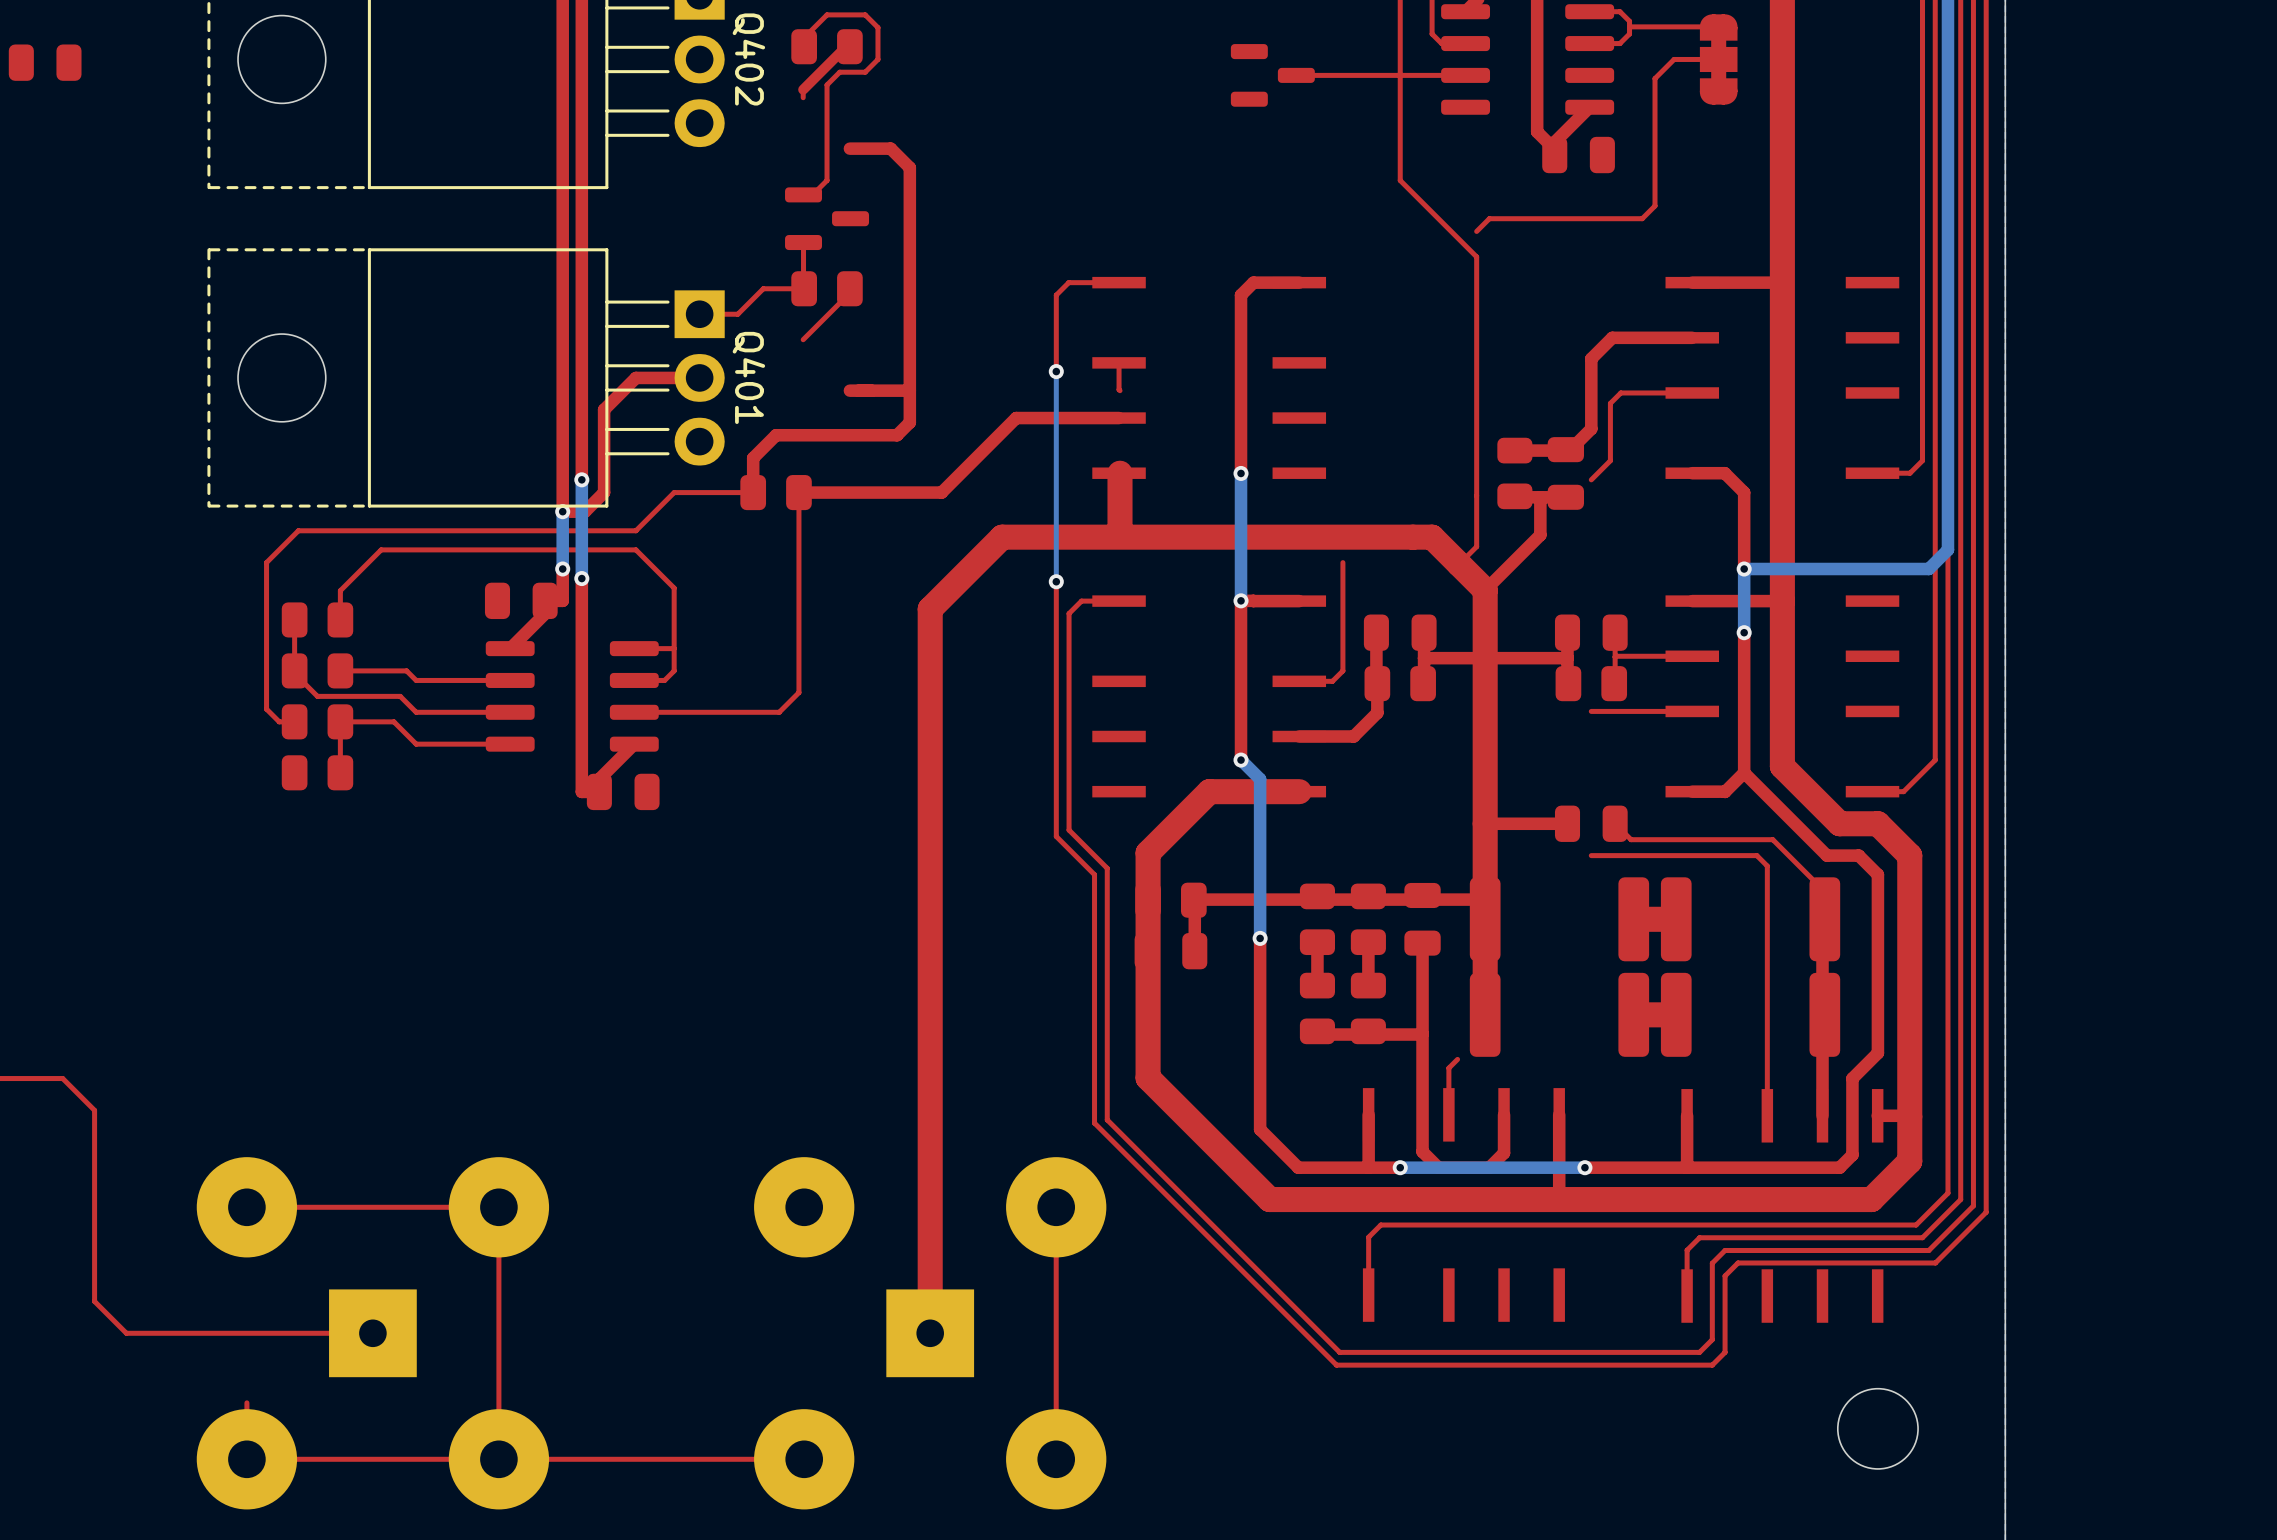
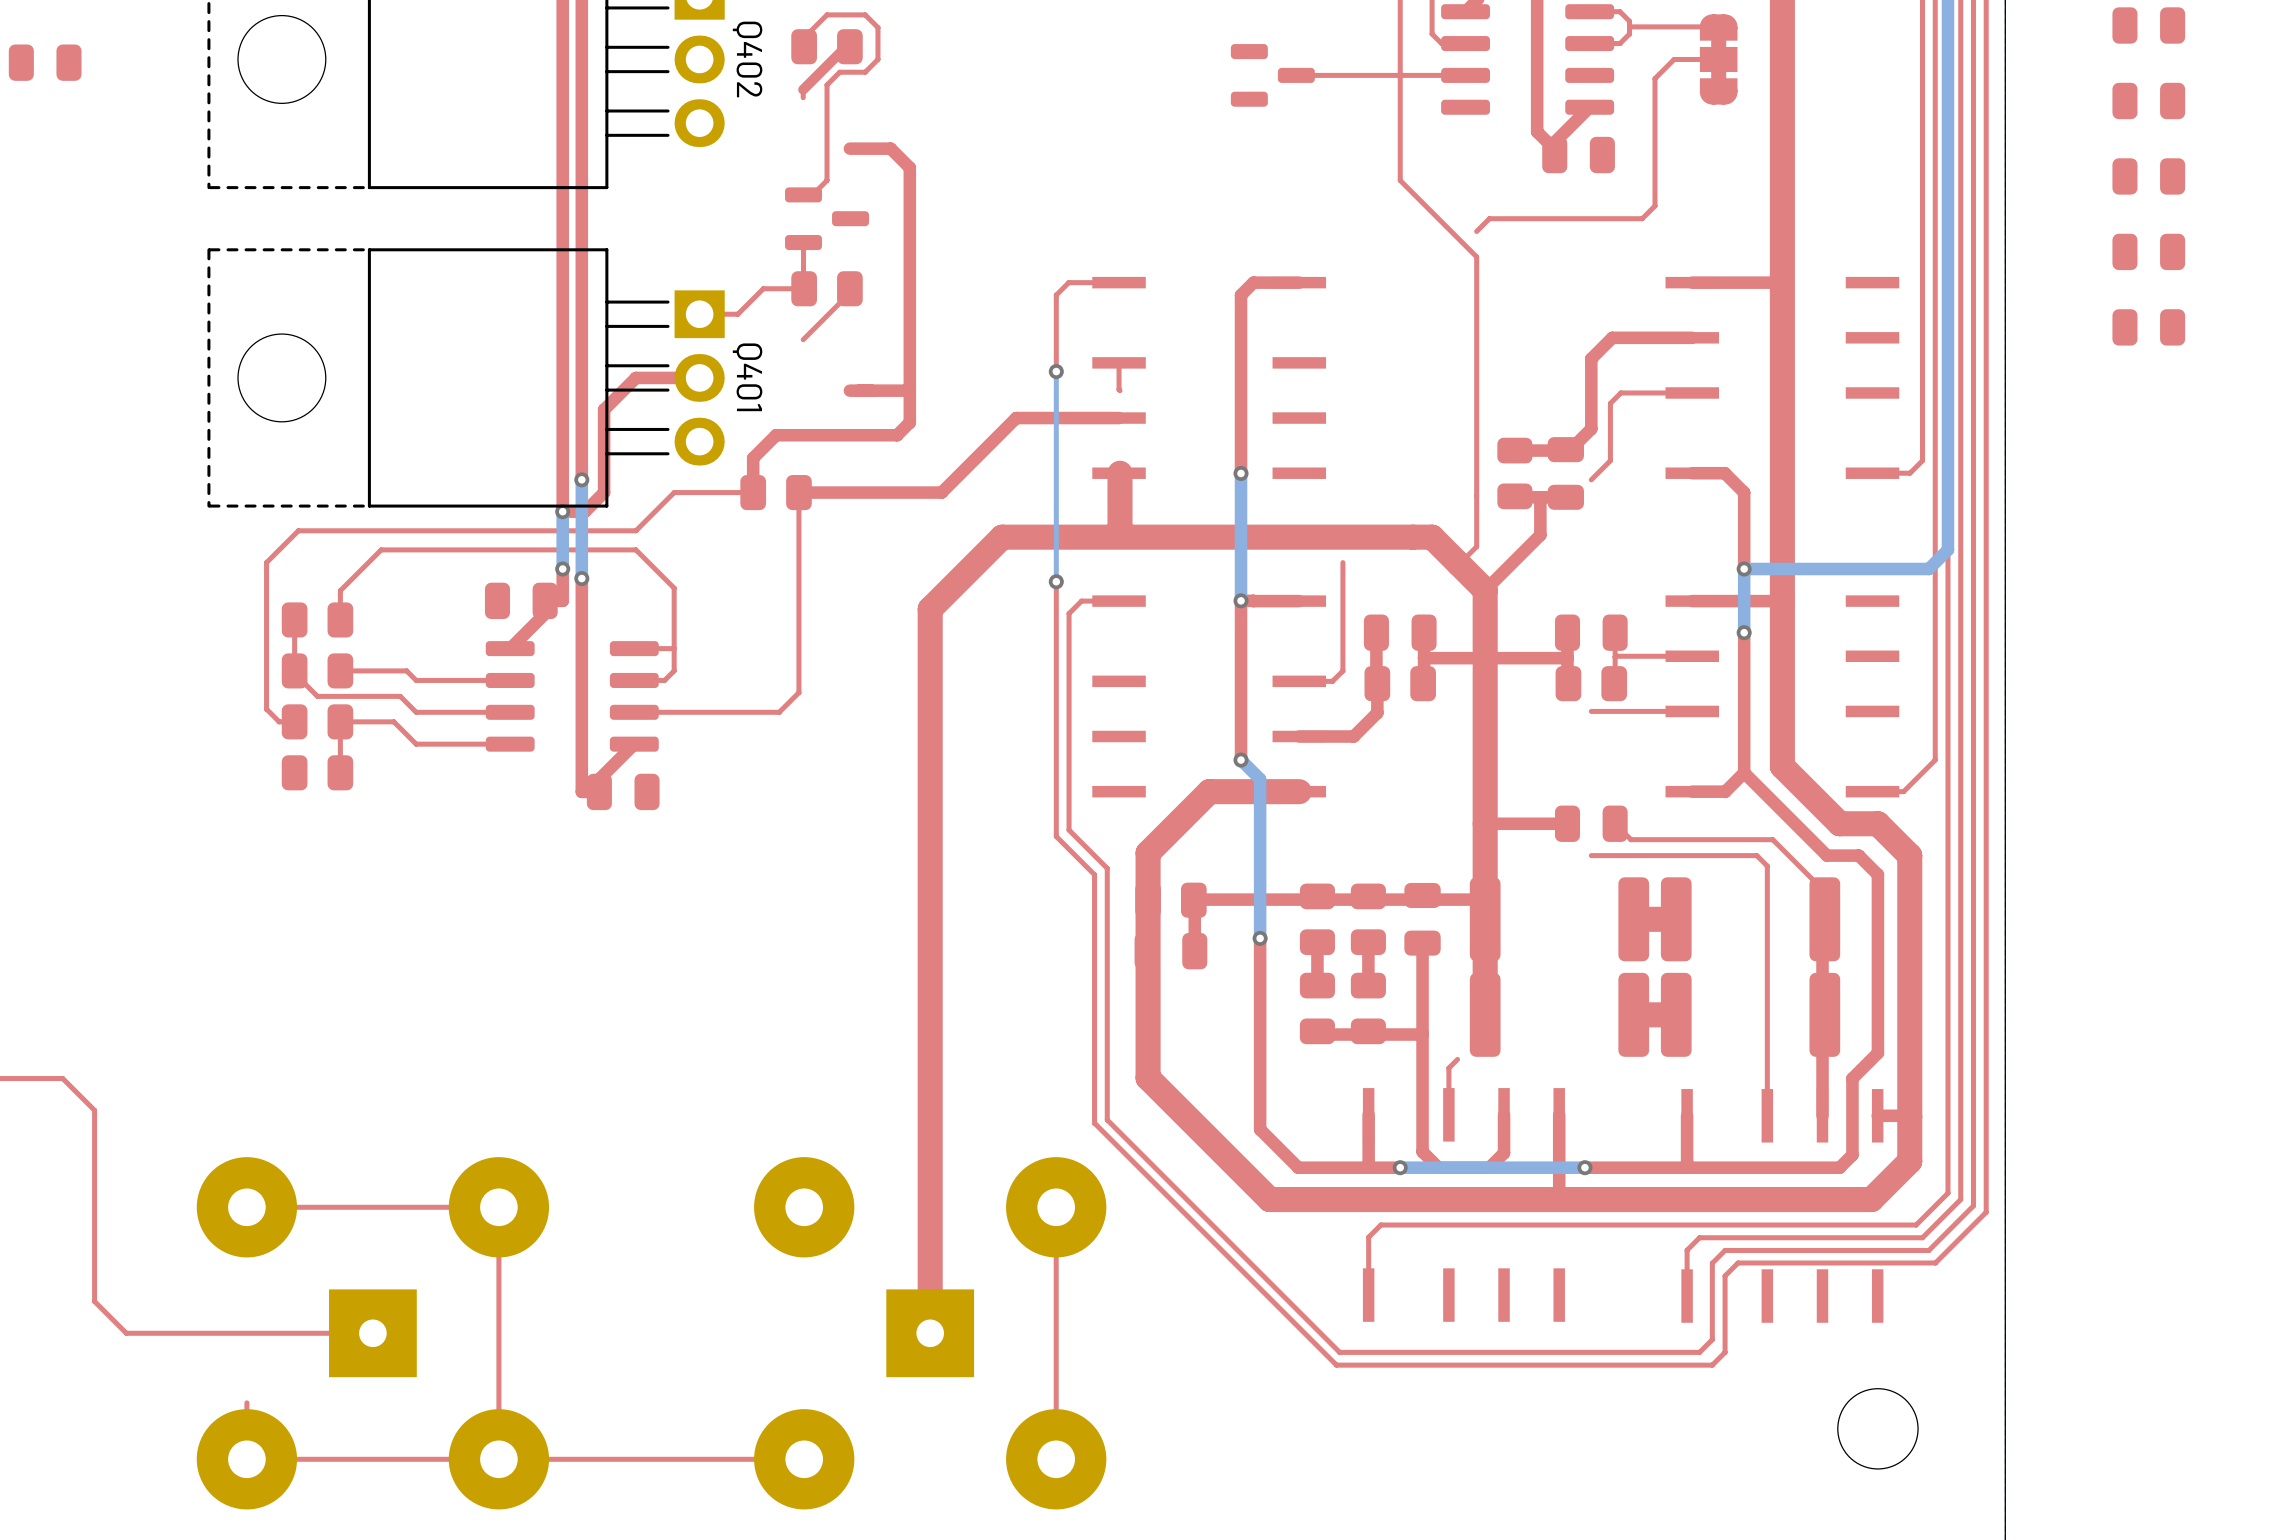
part: none -> (2148, 25)
part: none -> (2148, 100)
part: none -> (2148, 176)
part: none -> (2148, 251)
part: none -> (2148, 327)

